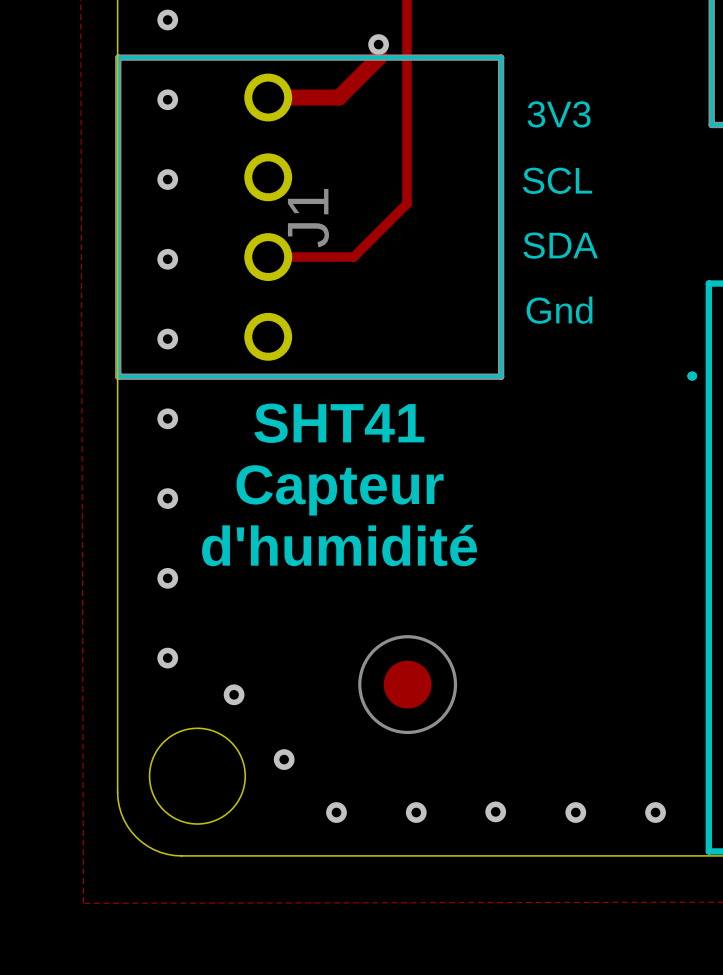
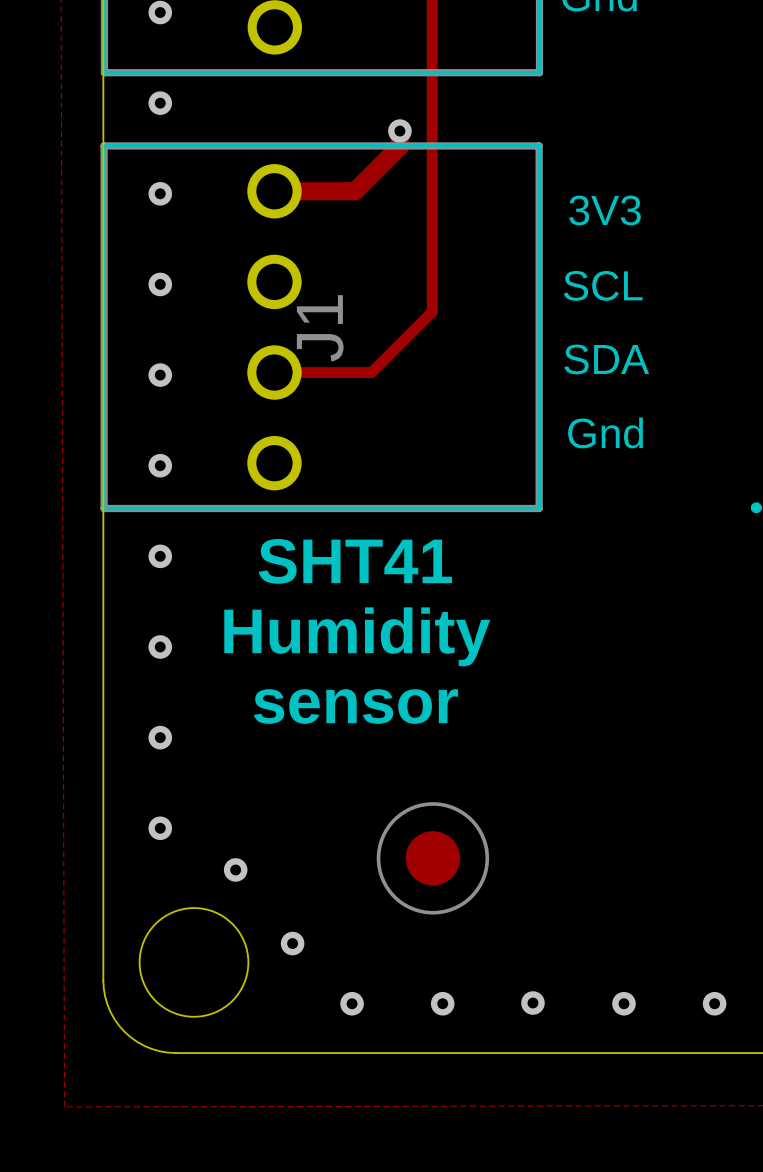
text: Capteur (340, 490) -> Humidity (357, 636)
text: d'humidité (339, 545) -> sensor (355, 706)

